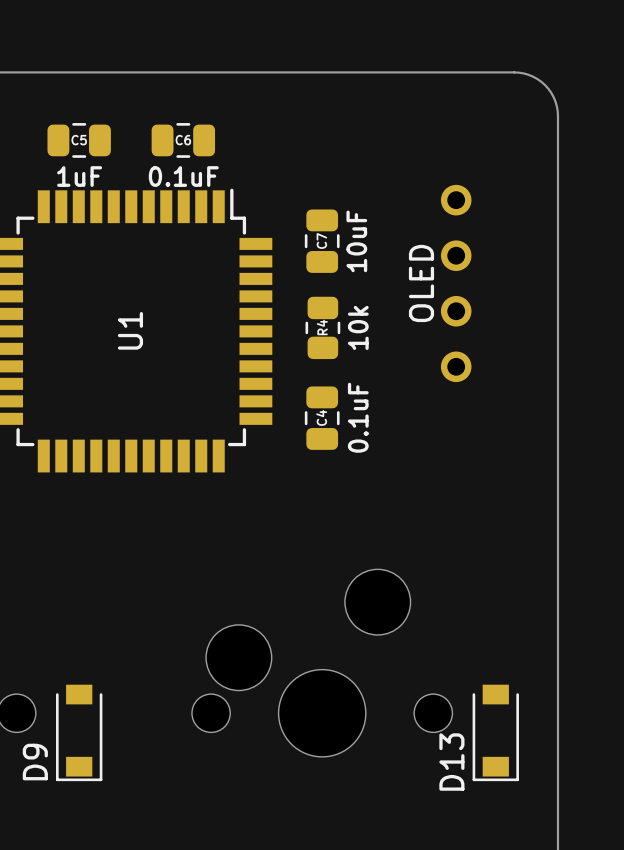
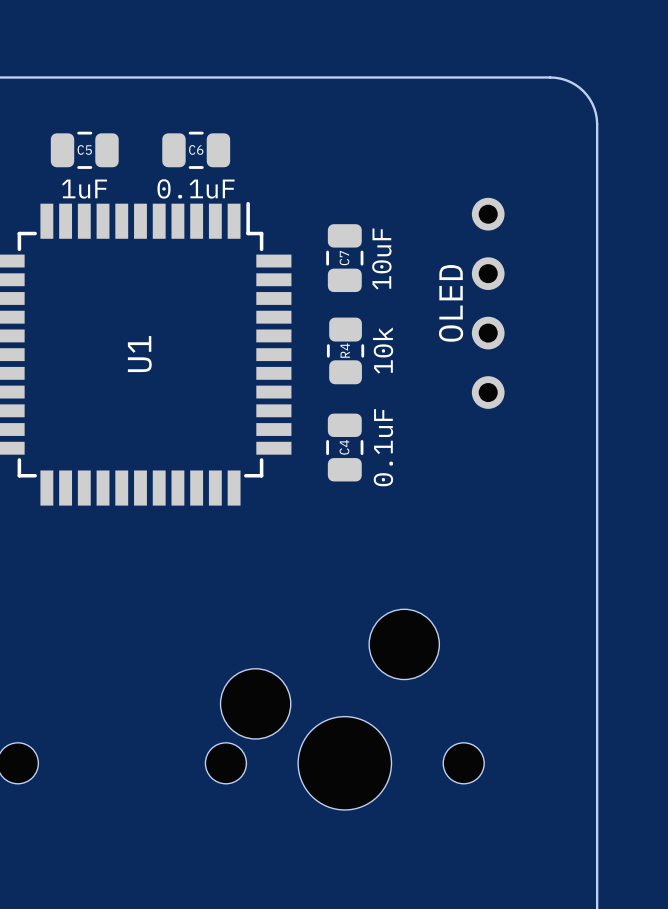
D9: (79, 732) -> none
D13: (495, 732) -> none

